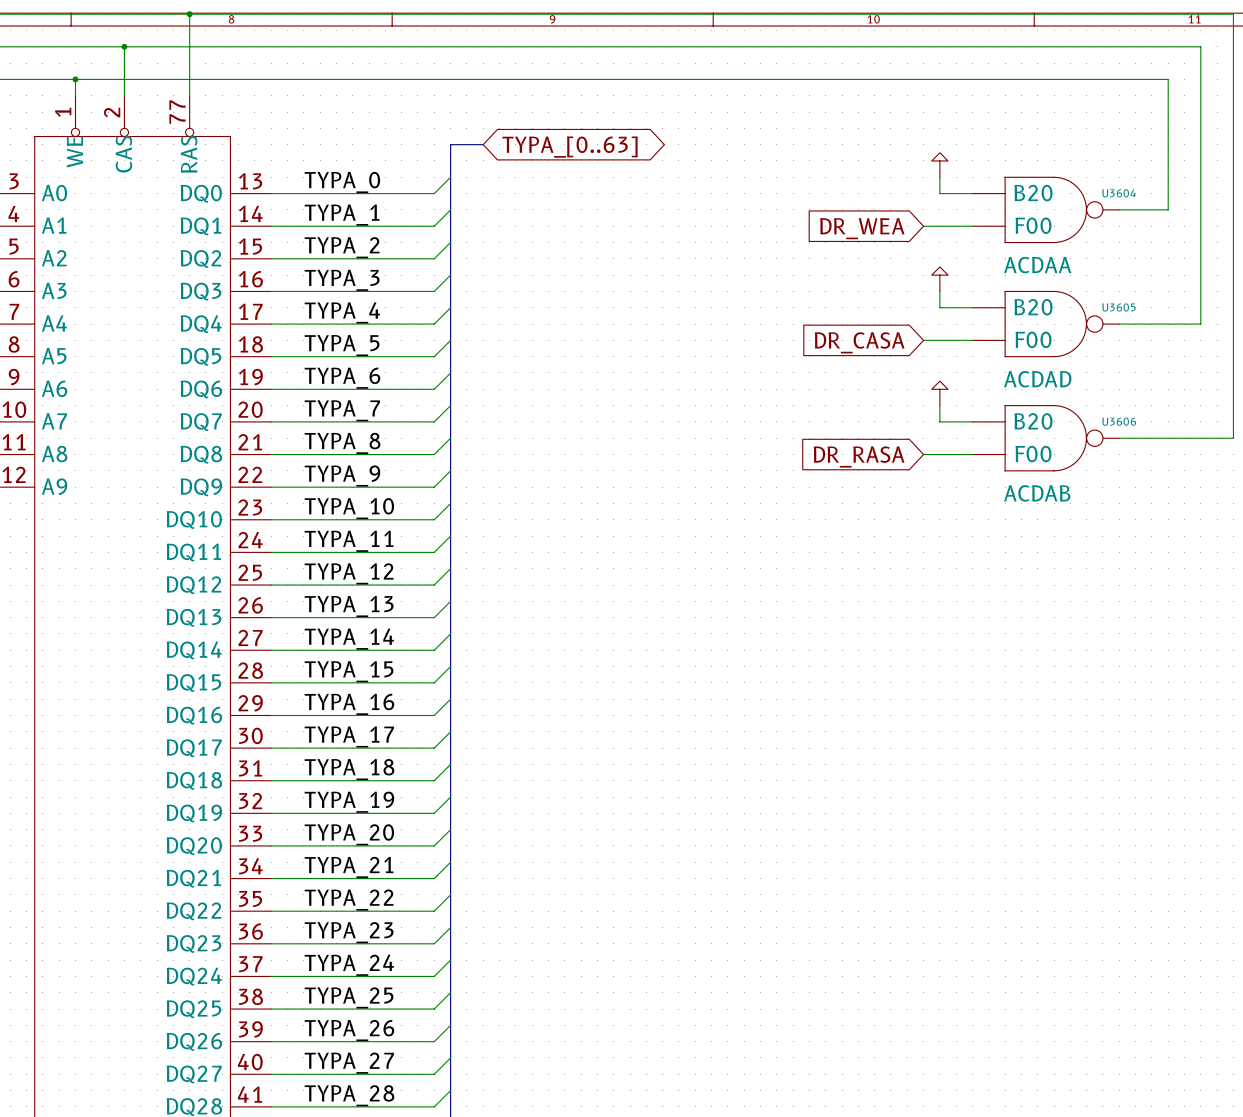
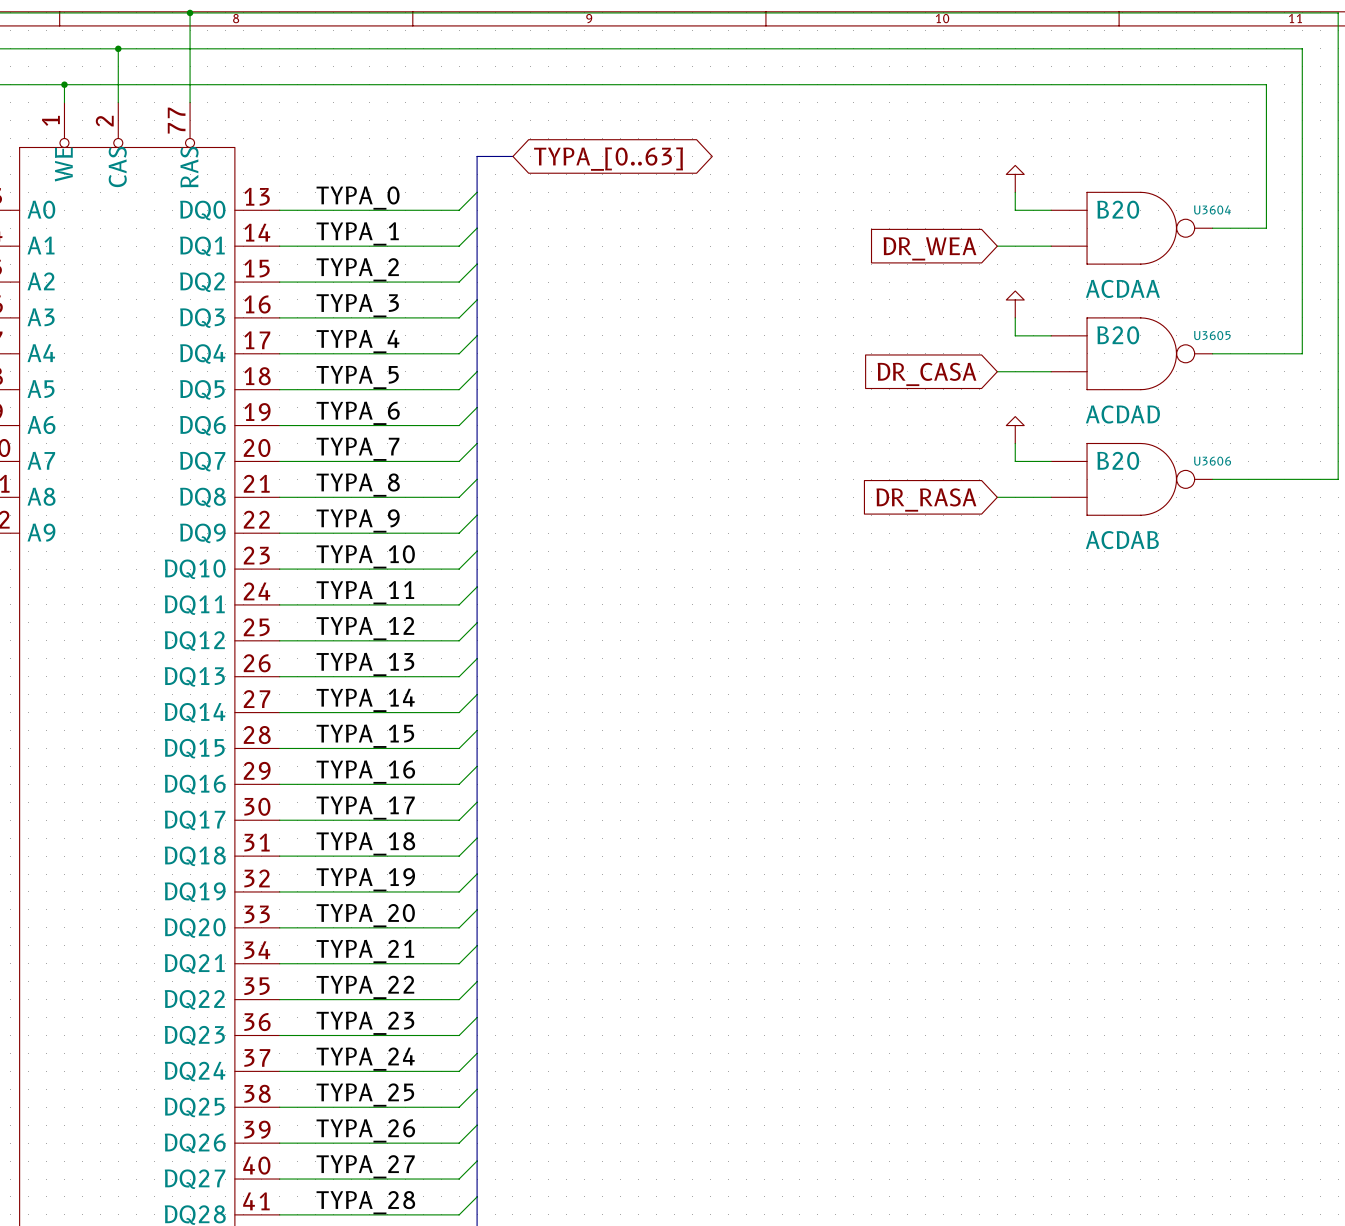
U3604 value: F00 (1033, 225) -> none
U3605 value: F00 (1033, 339) -> none
U3606 value: F00 (1033, 454) -> none

